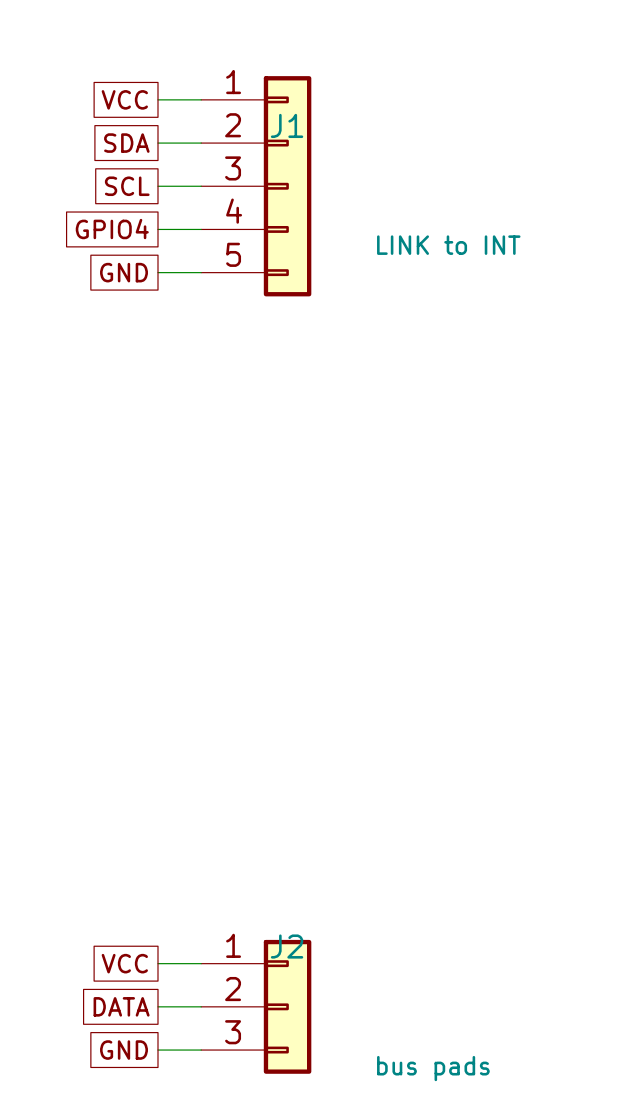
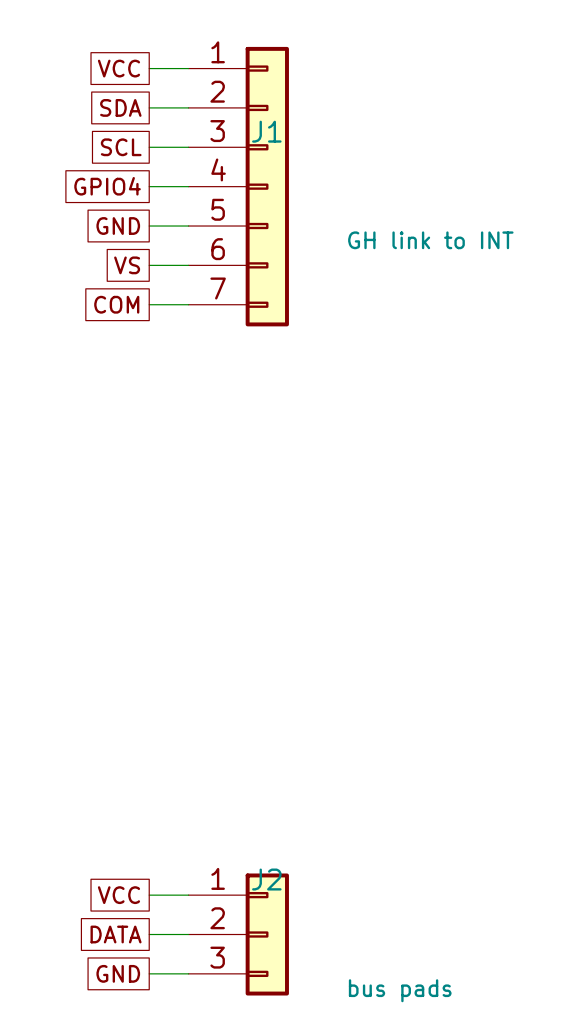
global label: none -> VCC (118, 68)
wire: none -> (149, 68) (188, 68)
J1 symbol: [201, 76, 312, 297] -> [188, 46, 289, 327]
global label: VCC (124, 99) -> SDA (120, 107)
global label: SDA (126, 143) -> SCL (121, 147)
global label: SCL (127, 186) -> GPIO4 (107, 186)
global label: GPIO4 (112, 229) -> GND (118, 226)
J1 value: LINK to INT (448, 245) -> GH link to INT (430, 240)
global label: GND (124, 272) -> VS (127, 265)
global label: none -> COM (116, 304)
wire: none -> (149, 304) (188, 304)

